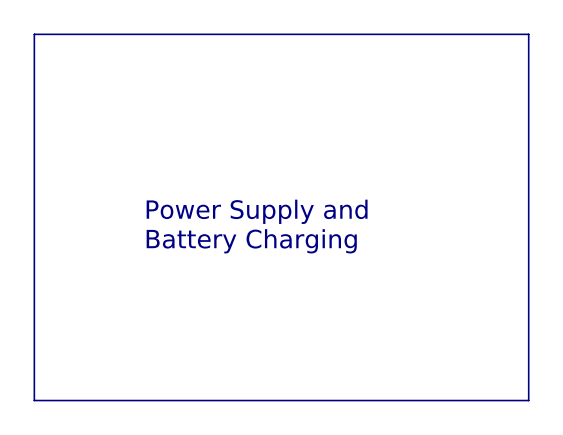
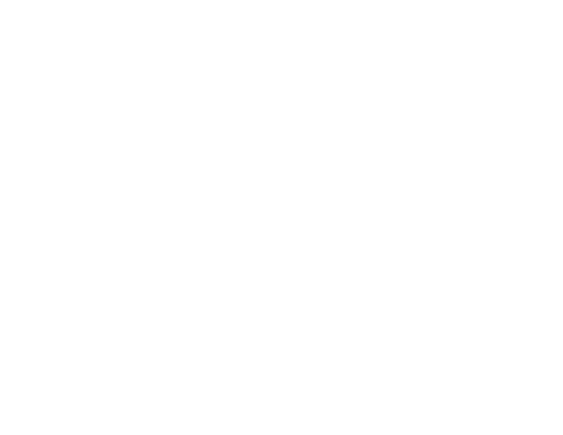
line: (34, 34) (528, 34) (528, 400) (34, 400) (34, 34) -> none
text: Power Supply and (257, 211) -> none
text: Battery Charging (251, 241) -> none

